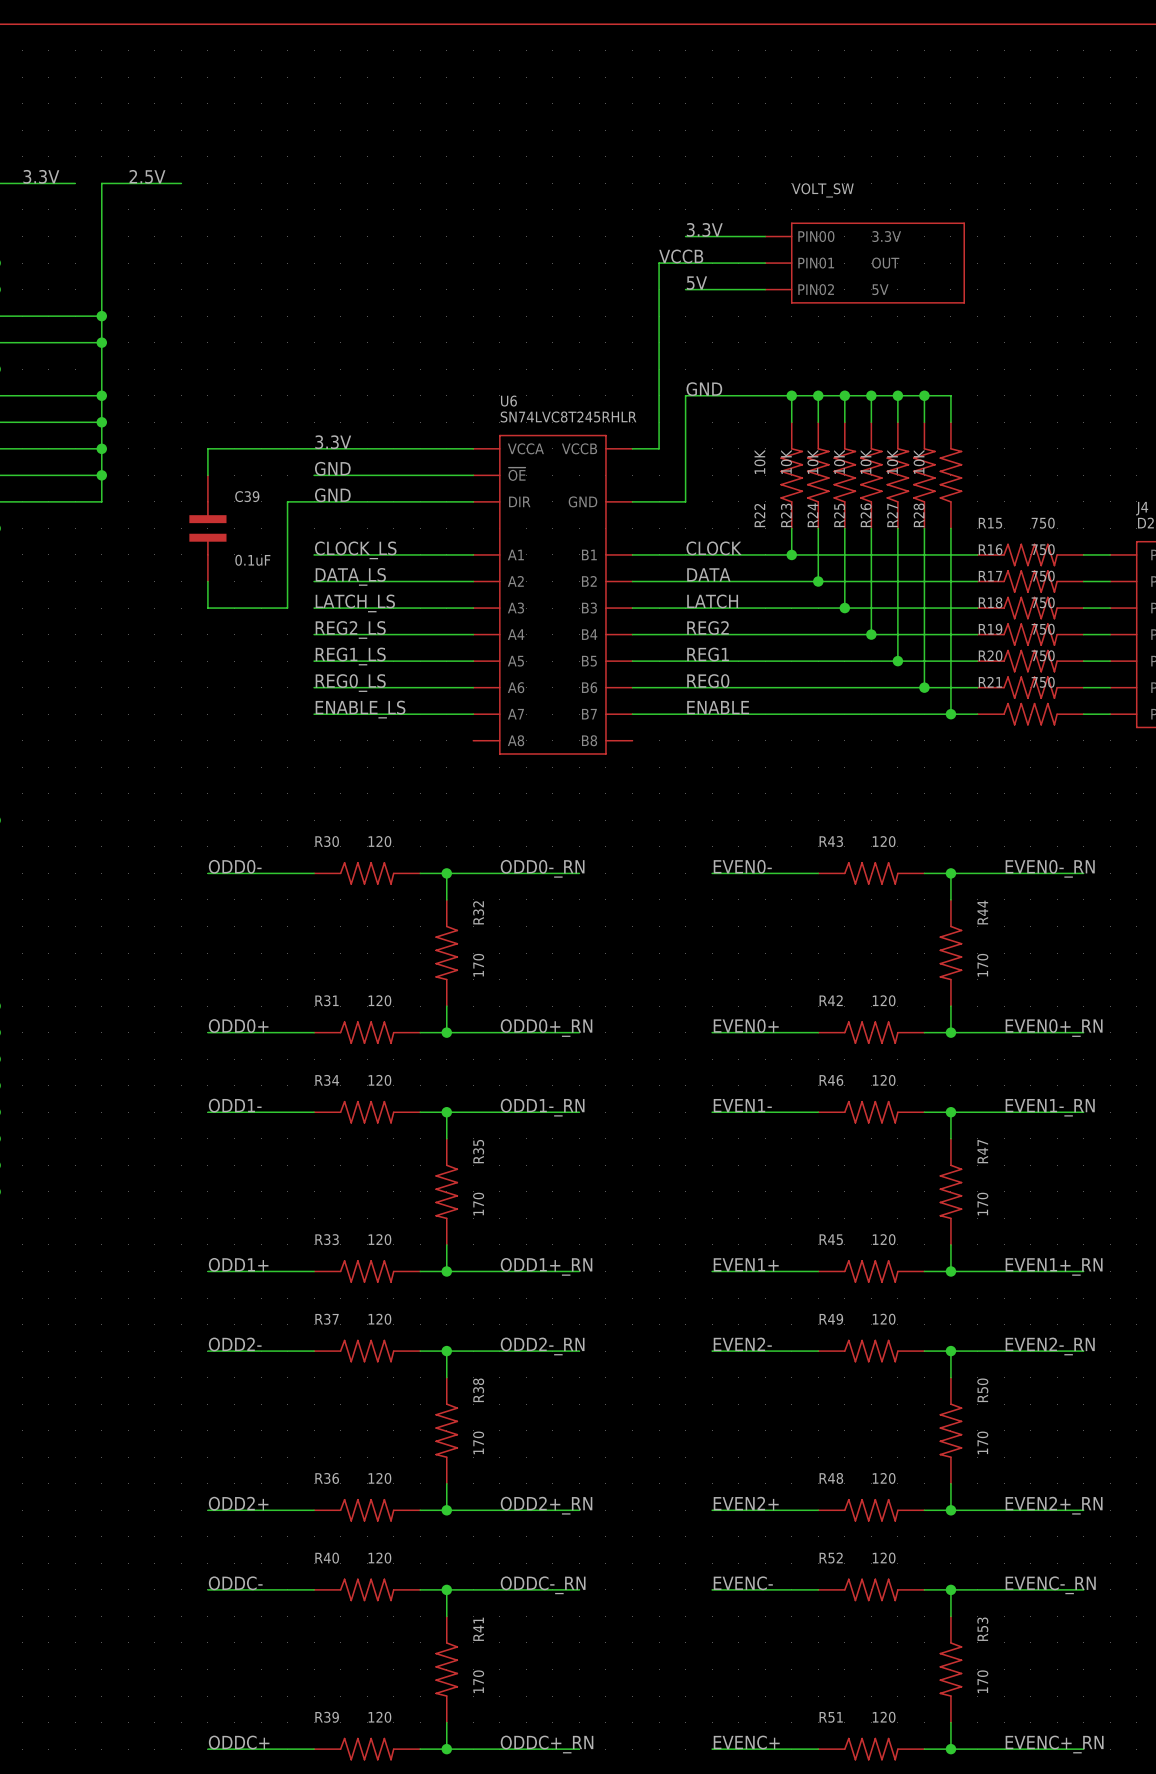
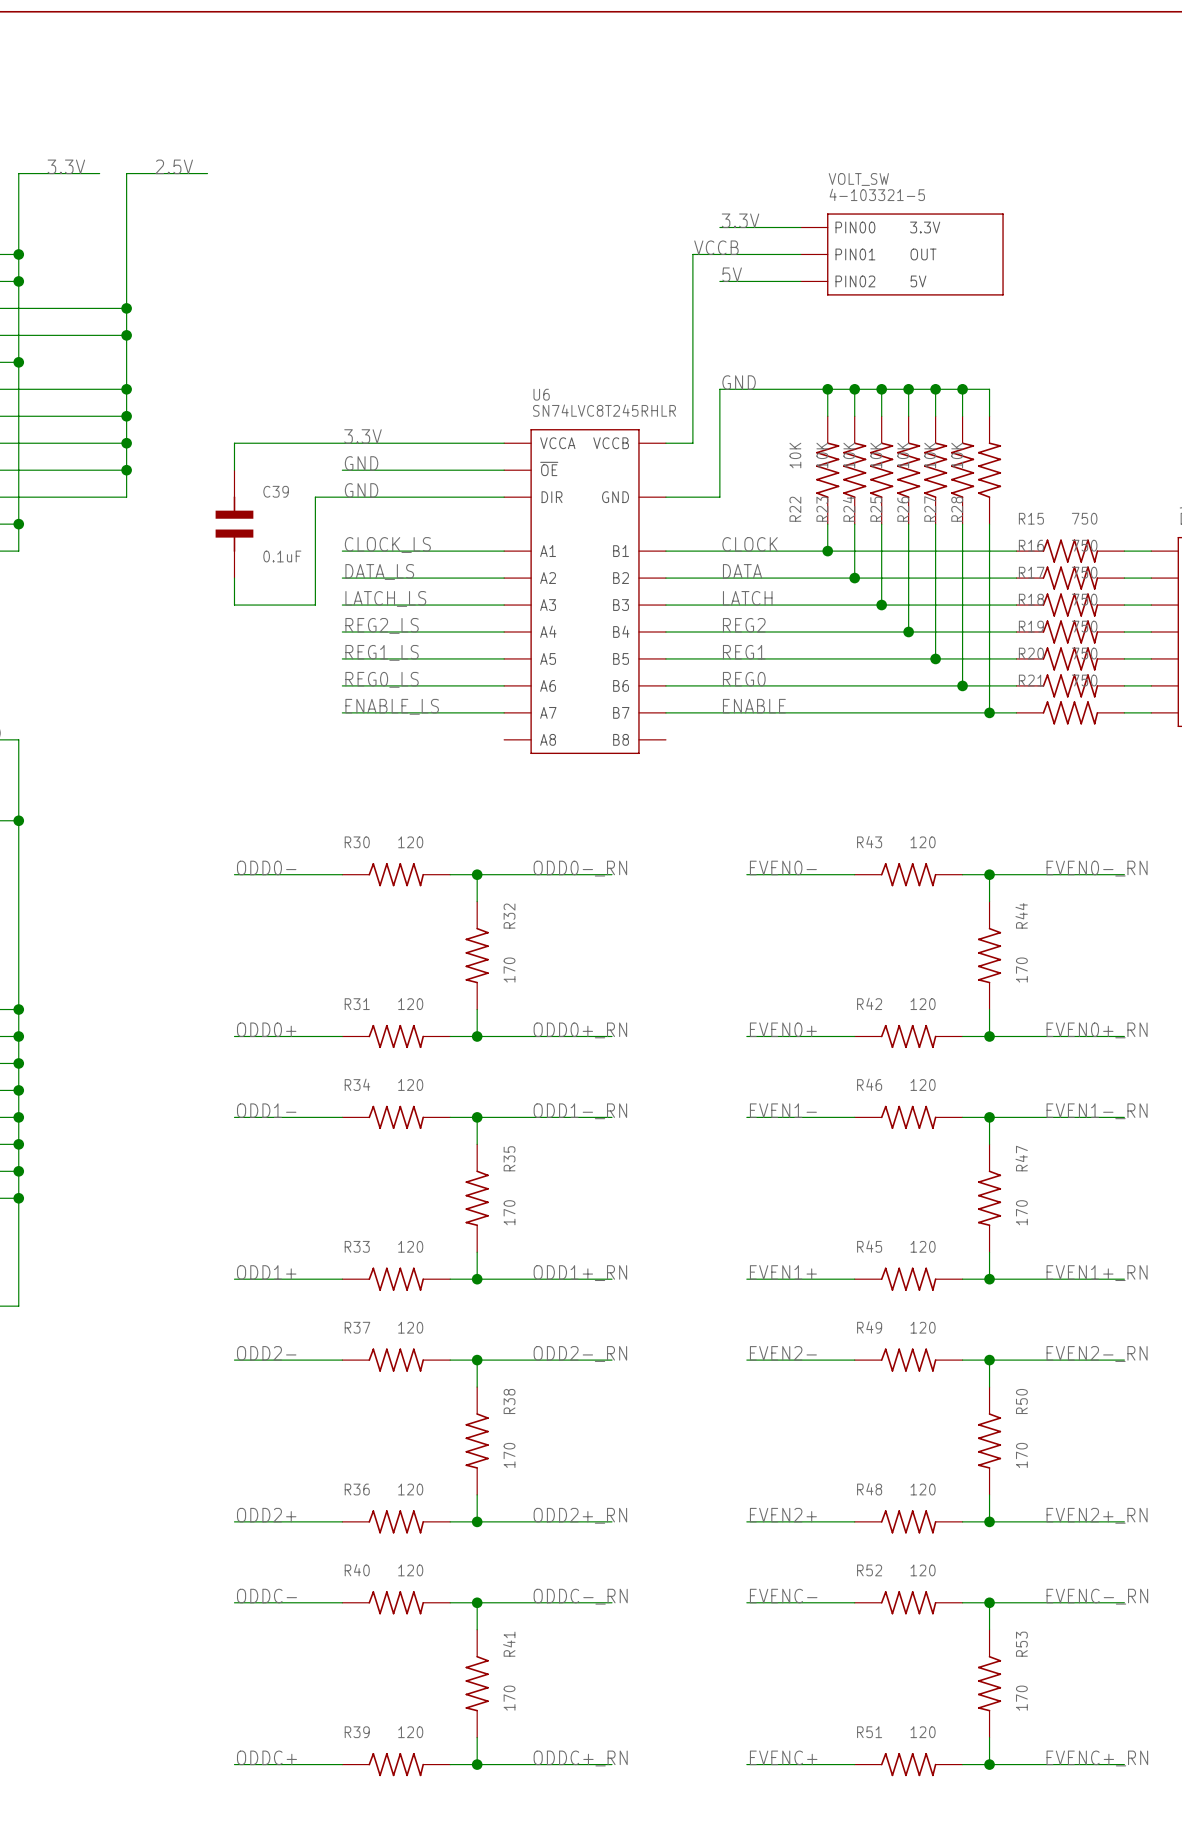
VOLT_SW value: none -> 4-103321-5 (877, 194)

